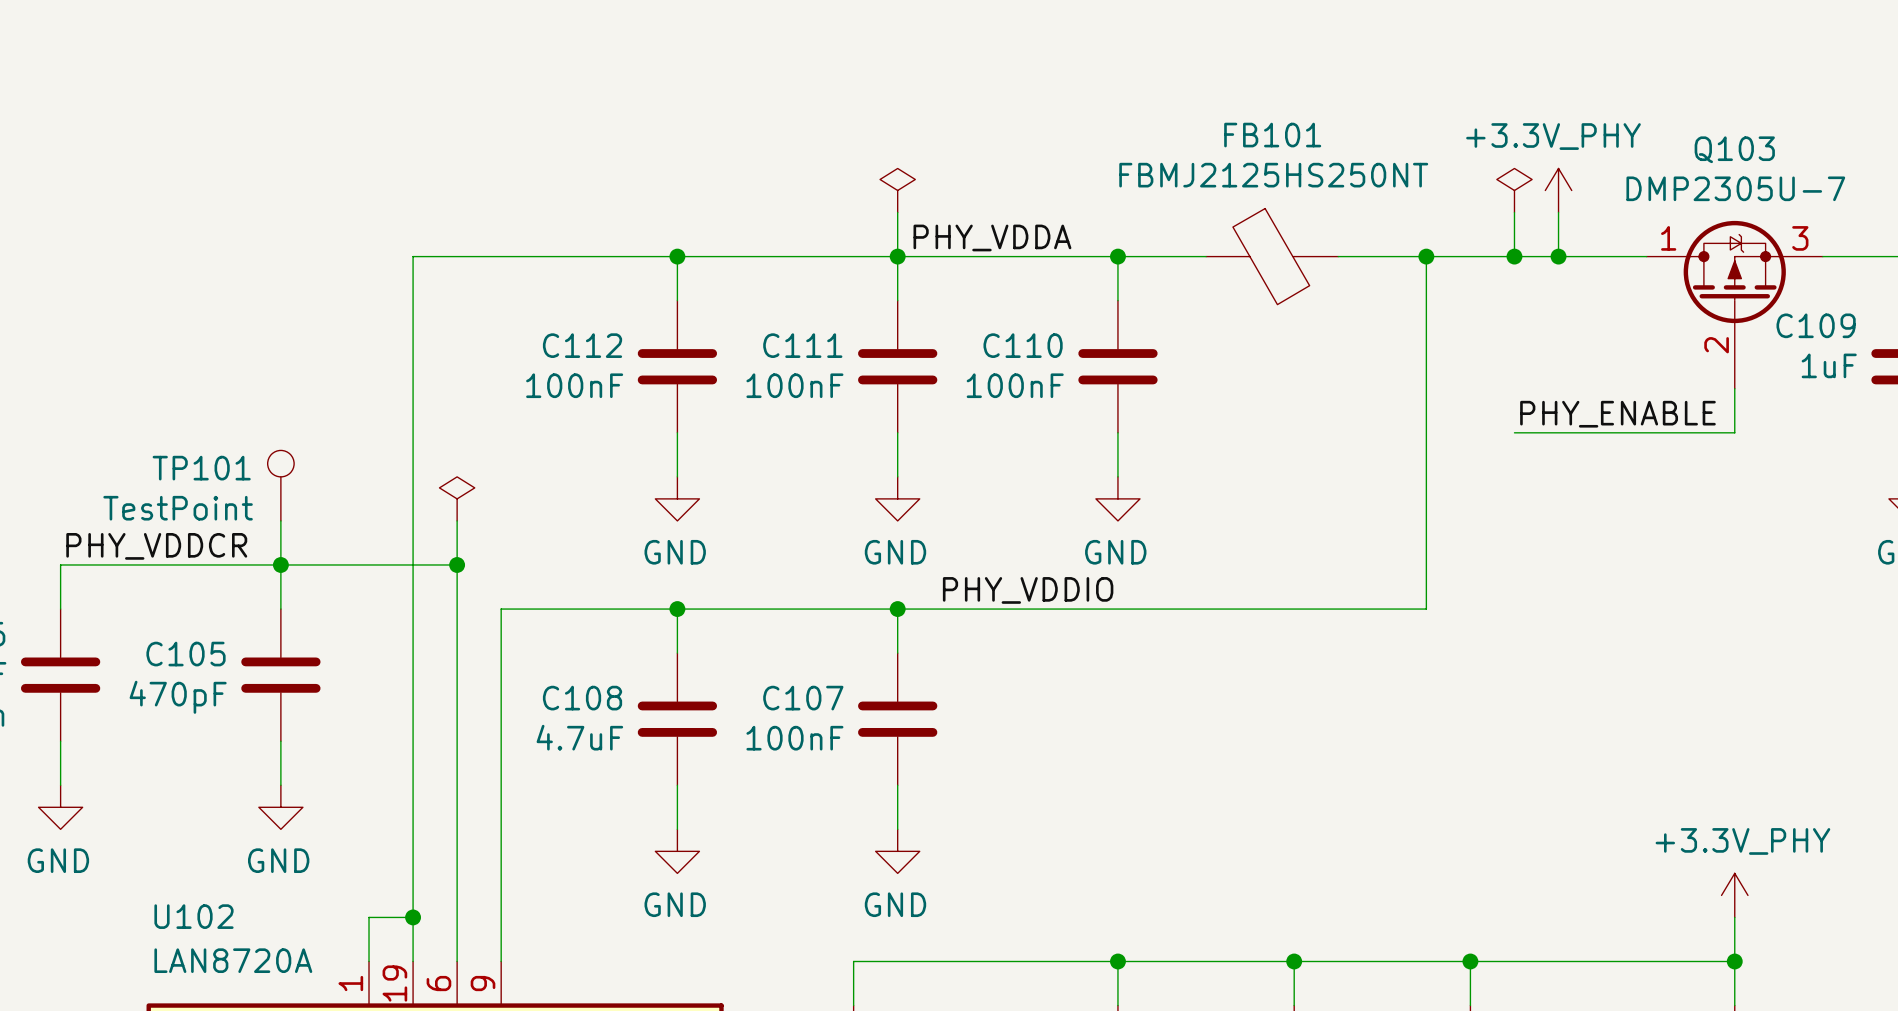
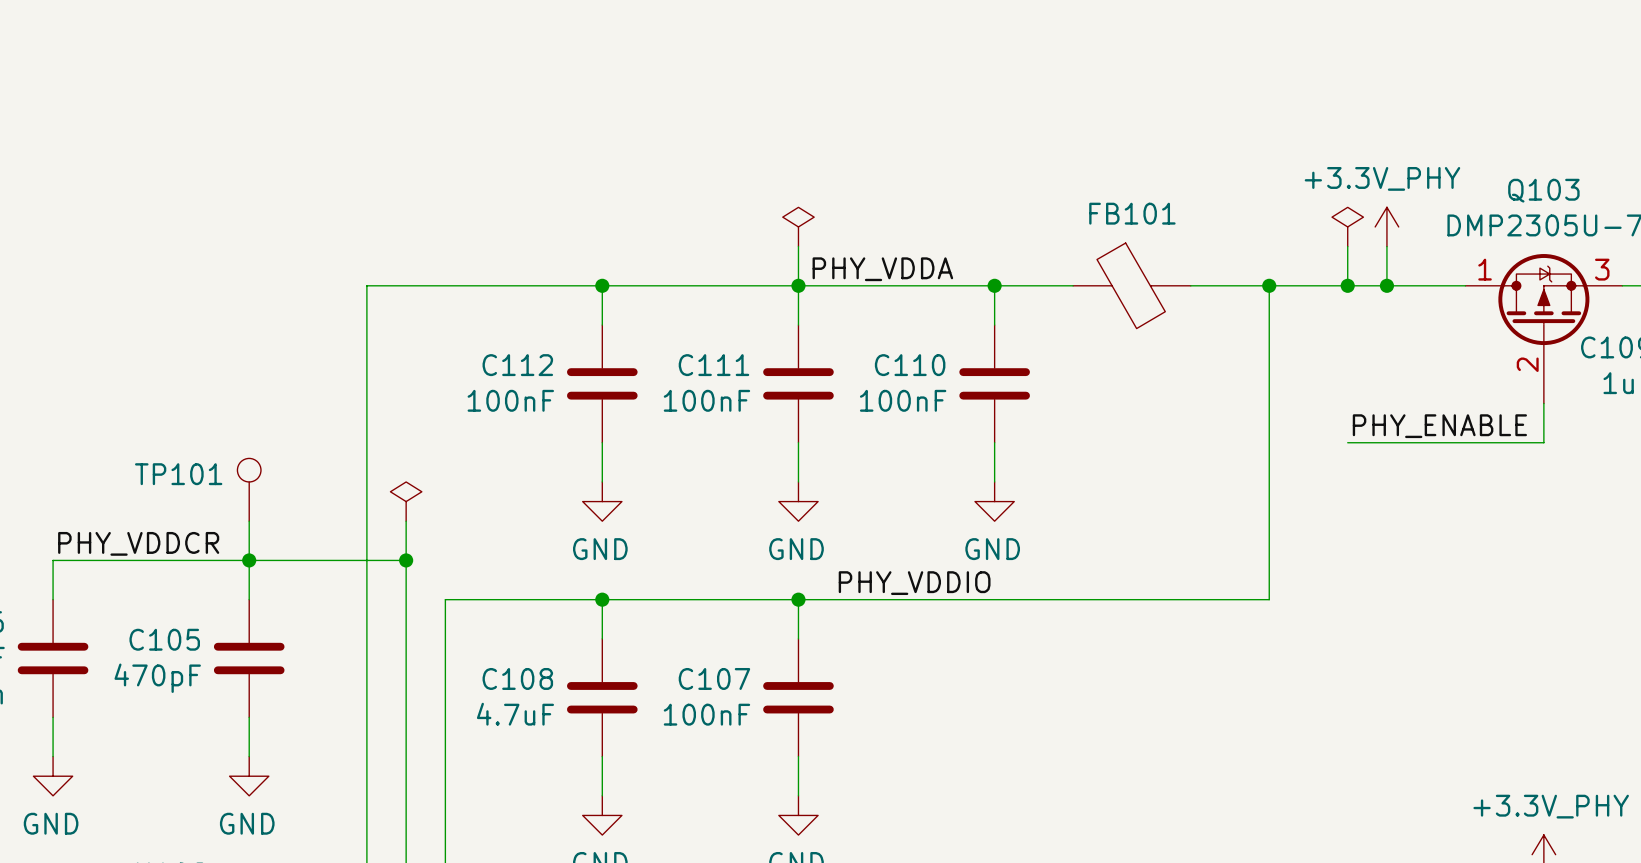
FB101 name position: FB101 (1272, 135) -> FB101 (1132, 213)
FB101 value: FBMJ2125HS250NT (1273, 175) -> none
TP101 value: TestPoint (178, 508) -> none

